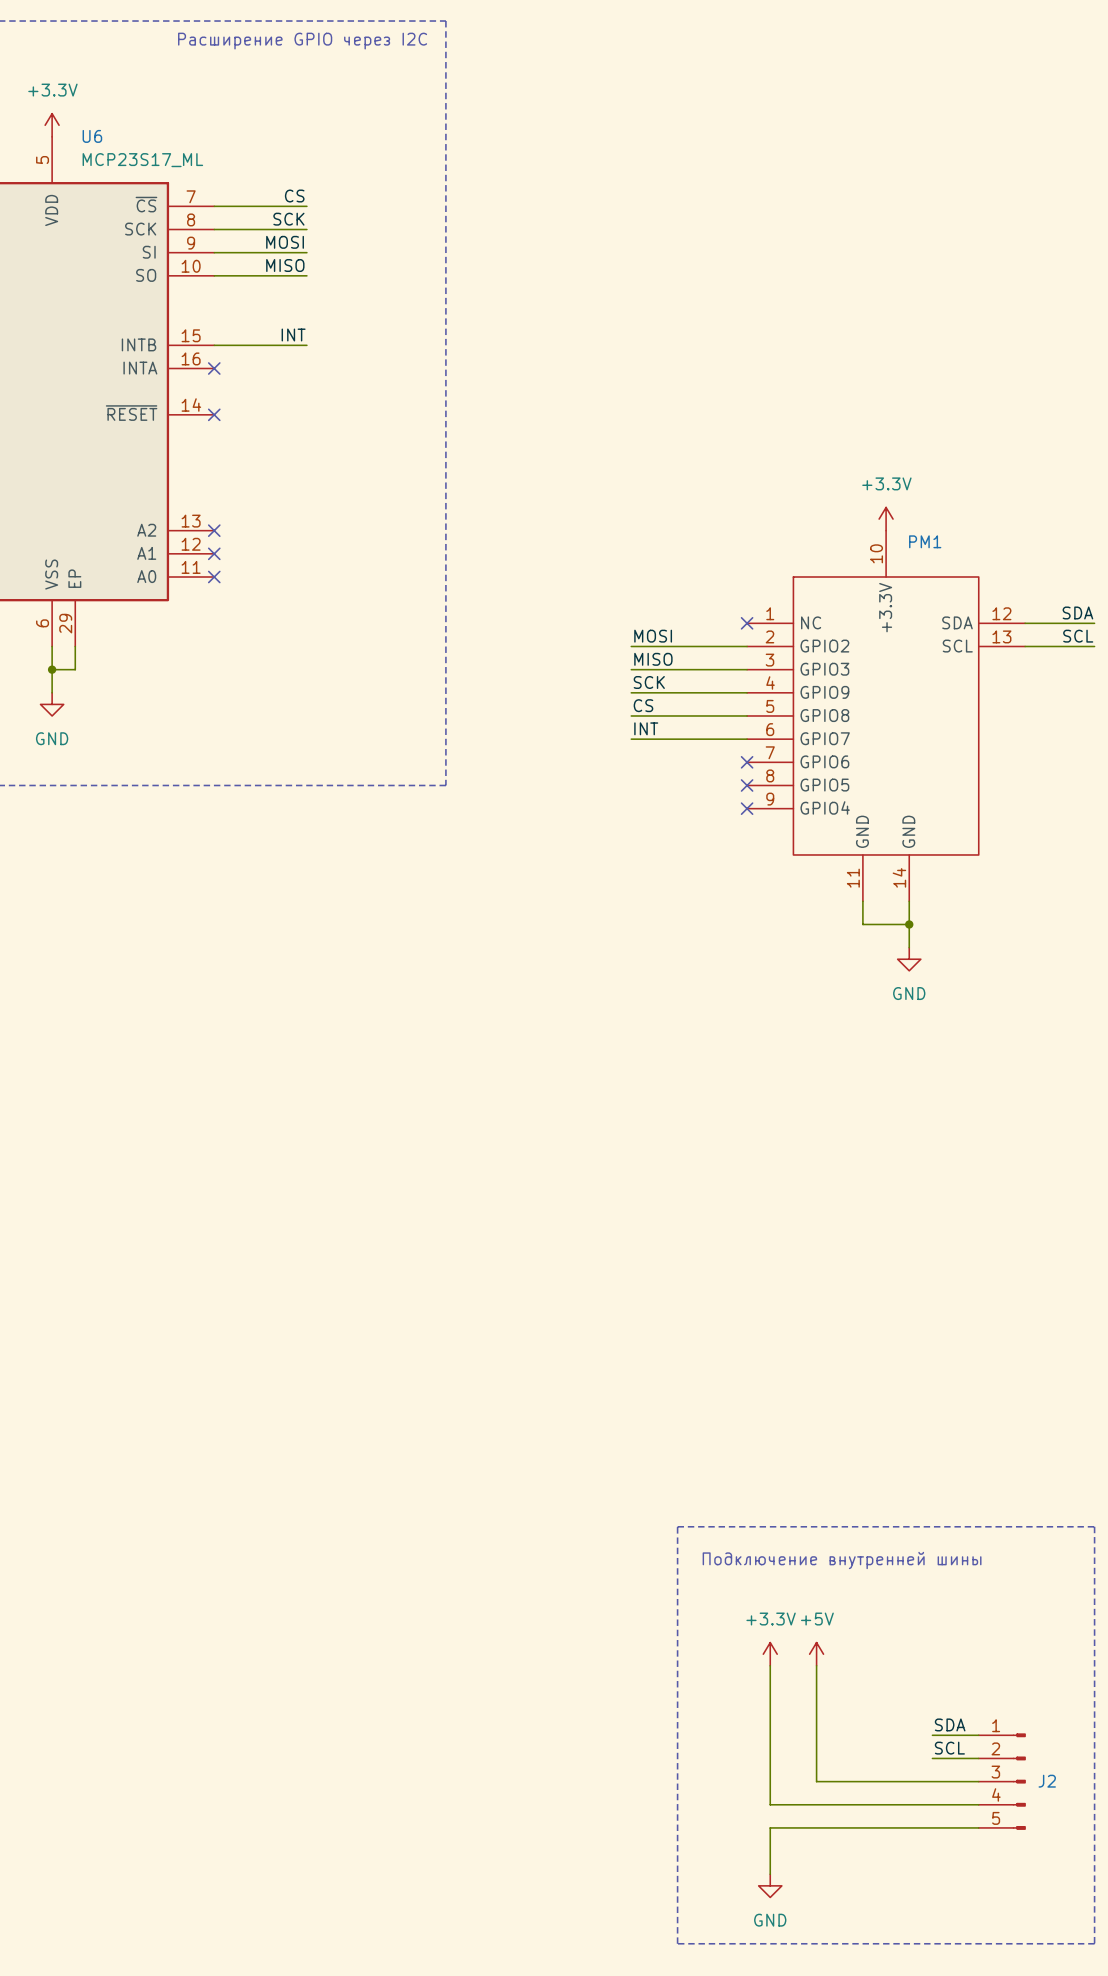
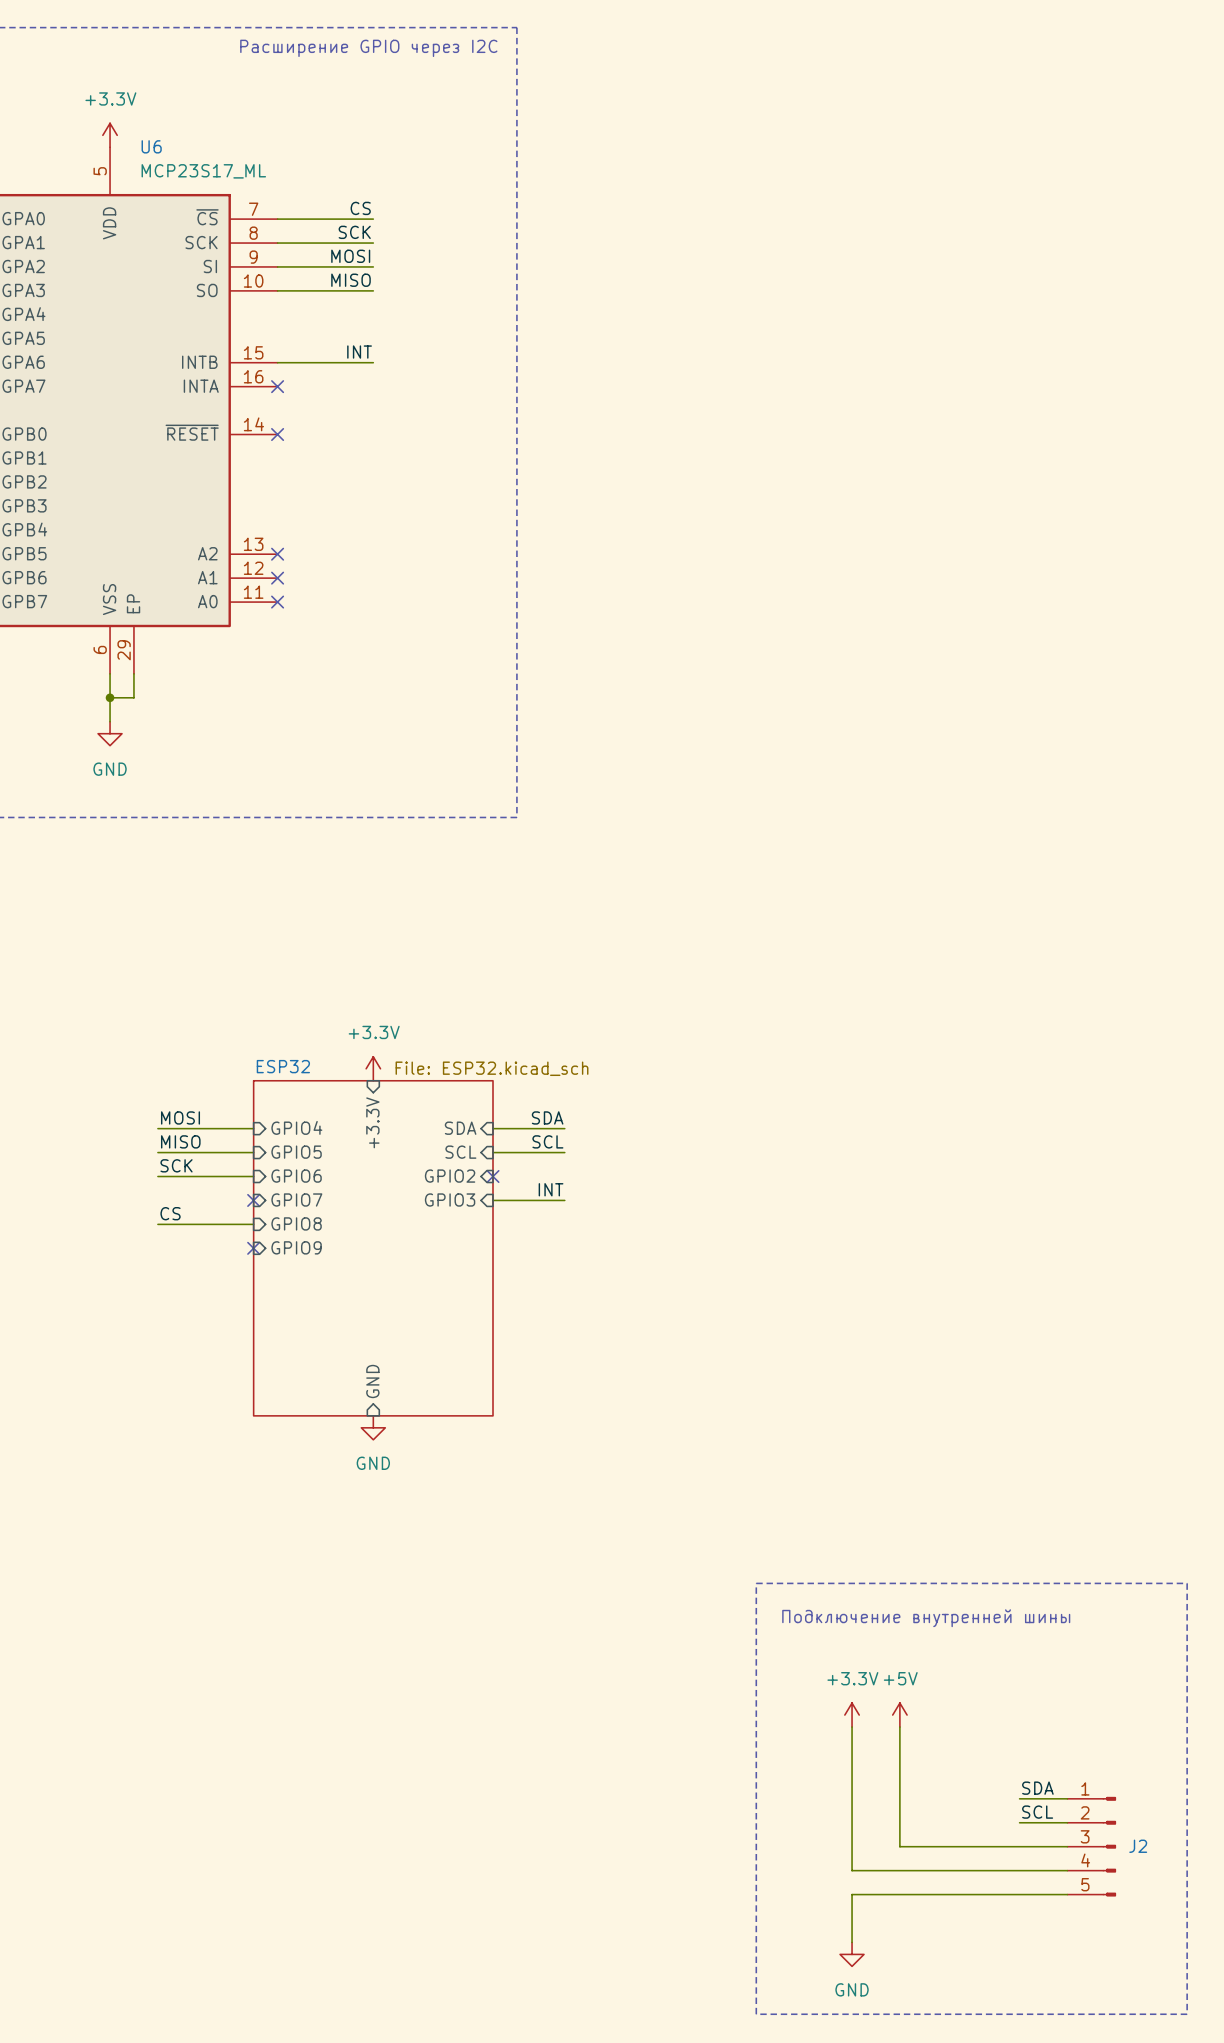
power symbol: +3.3V (886, 519) -> none
label: SDA (1077, 612) -> none
no-connect mark: (747, 623) -> none
wire: (1025, 623) (1094, 623) -> none
label: MOSI (653, 636) -> none
label: SCL (1078, 636) -> none
wire: (631, 646) (747, 646) -> none
wire: (1025, 646) (1094, 646) -> none
label: MISO (653, 659) -> none
wire: (631, 669) (747, 669) -> none
label: SCK (649, 682) -> none
wire: (631, 692) (747, 692) -> none
label: CS (643, 705) -> none
wire: (631, 715) (747, 715) -> none
PM1: (886, 715) -> none
label: INT (646, 728) -> none
wire: (631, 739) (747, 739) -> none
no-connect mark: (747, 762) -> none
no-connect mark: (747, 785) -> none
no-connect mark: (747, 808) -> none
wire: (862, 901) (862, 924) (909, 924) -> none
wire: (909, 901) (909, 947) -> none
junction: (909, 924) -> none
power symbol: GND (909, 959) -> none
power symbol: none -> +3.3V (373, 1068)
label: none -> MOSI (180, 1117)
label: none -> SDA (547, 1117)
sheet pin: none -> +3.3V (372, 1122)
sheet pin: none -> GPIO4 (296, 1127)
wire: none -> (157, 1128) (253, 1128)
sheet pin: none -> SDA (460, 1128)
wire: none -> (493, 1128) (564, 1128)
label: none -> MISO (180, 1141)
label: none -> SCL (547, 1141)
wire: none -> (157, 1152) (253, 1152)
sheet pin: none -> GPIO5 (296, 1152)
sheet pin: none -> SCL (460, 1152)
wire: none -> (493, 1152) (564, 1152)
label: none -> SCK (176, 1165)
wire: none -> (157, 1176) (253, 1176)
sheet pin: none -> GPIO6 (296, 1176)
sheet pin: none -> GPIO2 (450, 1176)
no-connect mark: none -> (493, 1176)
label: none -> INT (551, 1189)
sheet pin: none -> GPIO7 (296, 1200)
sheet pin: none -> GPIO3 (450, 1200)
no-connect mark: none -> (253, 1200)
wire: none -> (493, 1200) (564, 1200)
label: none -> CS (170, 1213)
sheet pin: none -> GPIO8 (296, 1223)
wire: none -> (157, 1224) (253, 1224)
no-connect mark: none -> (253, 1248)
sheet pin: none -> GPIO9 (296, 1247)
sheet ESP32: none -> File: ESP32.kicad_sch (373, 1248)
sheet pin: none -> GND (372, 1381)
power symbol: none -> GND (373, 1427)

